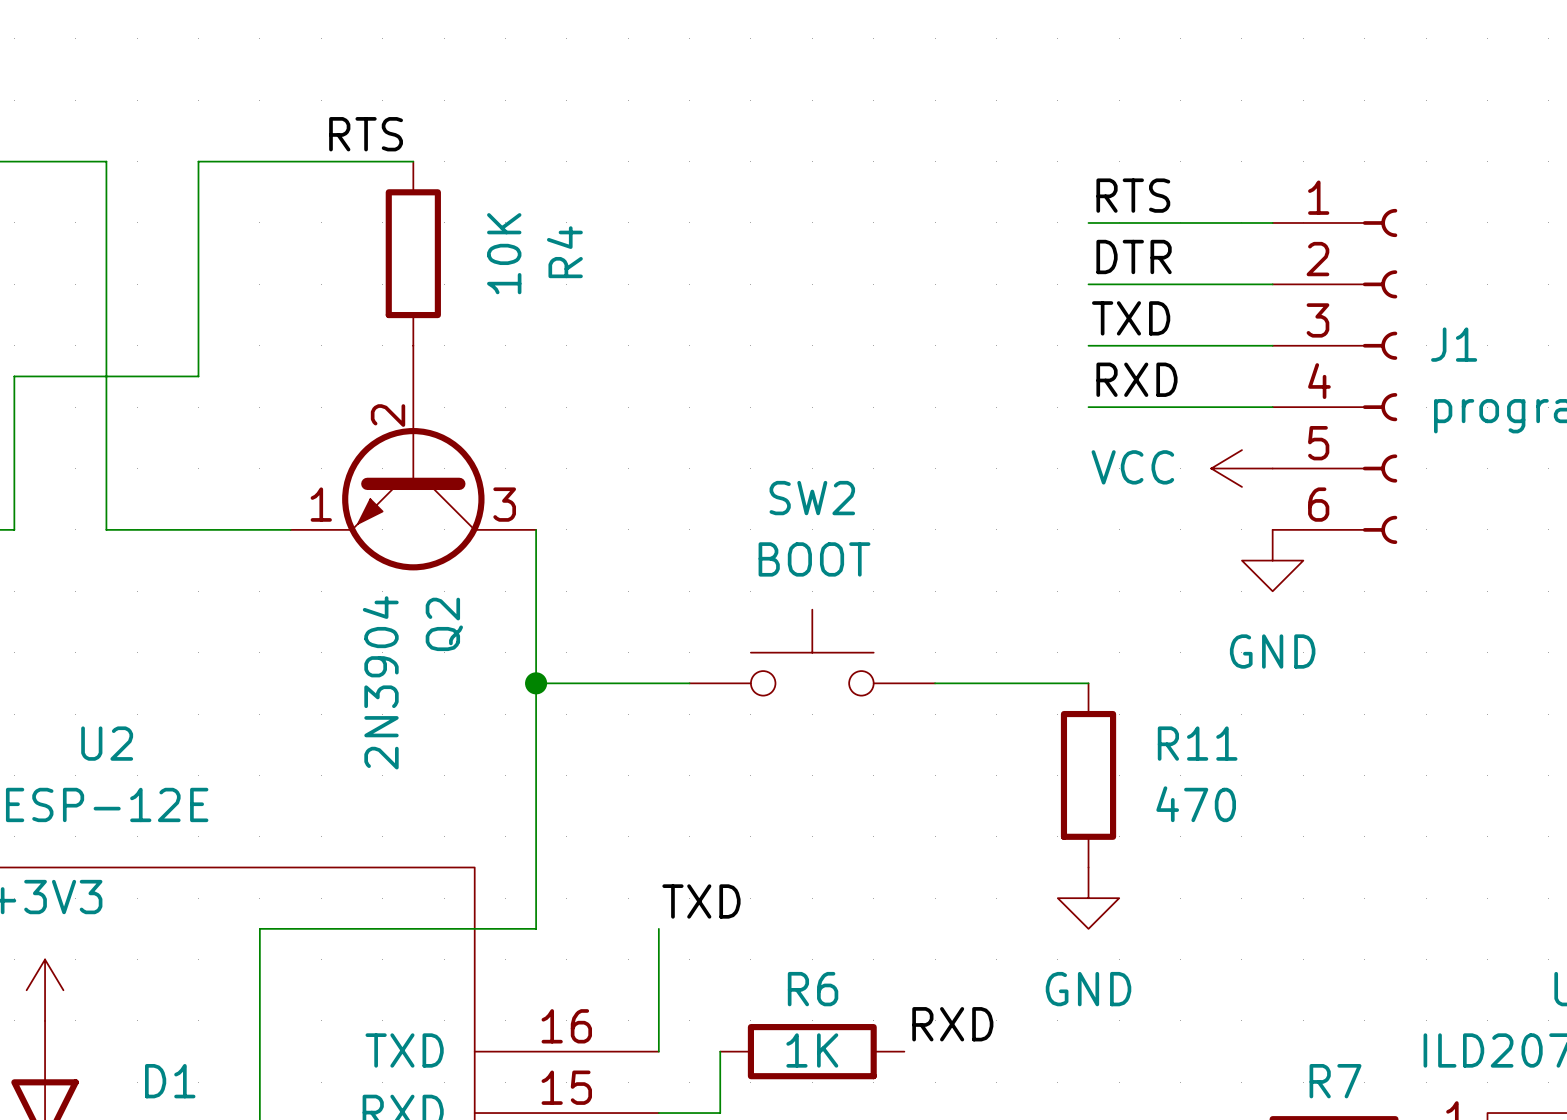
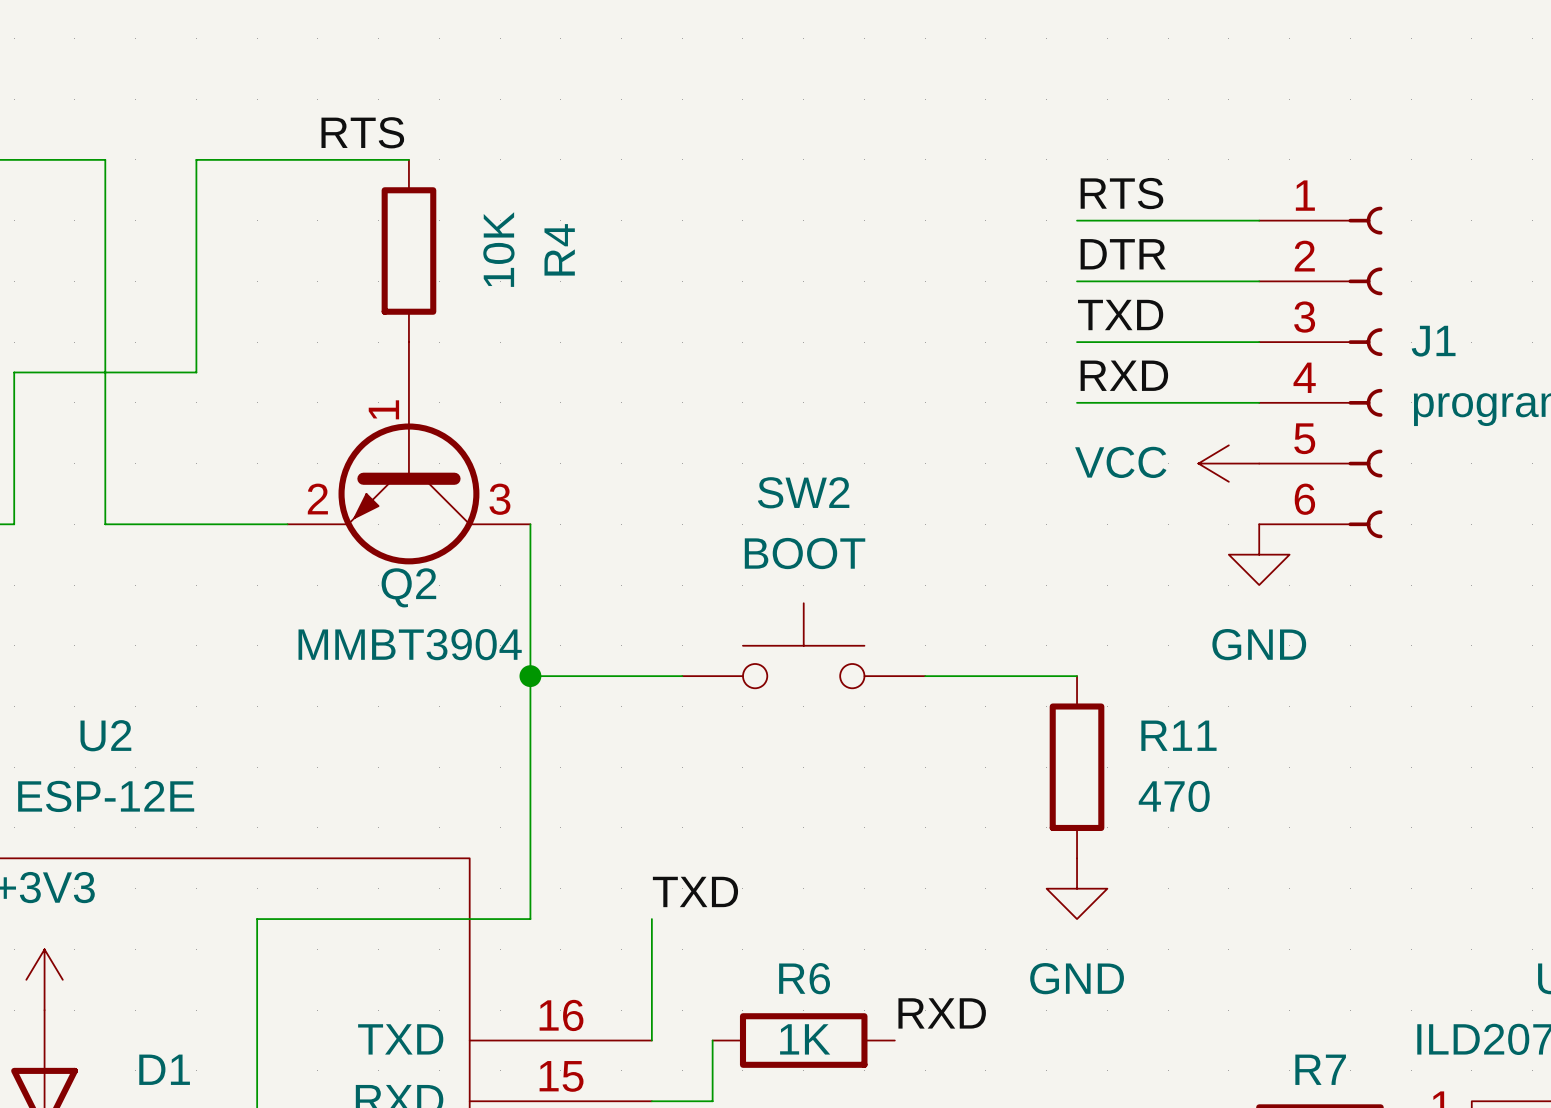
Q2 pin number: 2 (388, 415) -> 1 (383, 409)
Q2 pin number: 1 (321, 504) -> 2 (317, 499)
Q2 name rotation: 0° (444, 624) -> 90° clockwise (408, 587)
Q2 value: 2N3904 (380, 682) -> MMBT3904 (410, 644)

